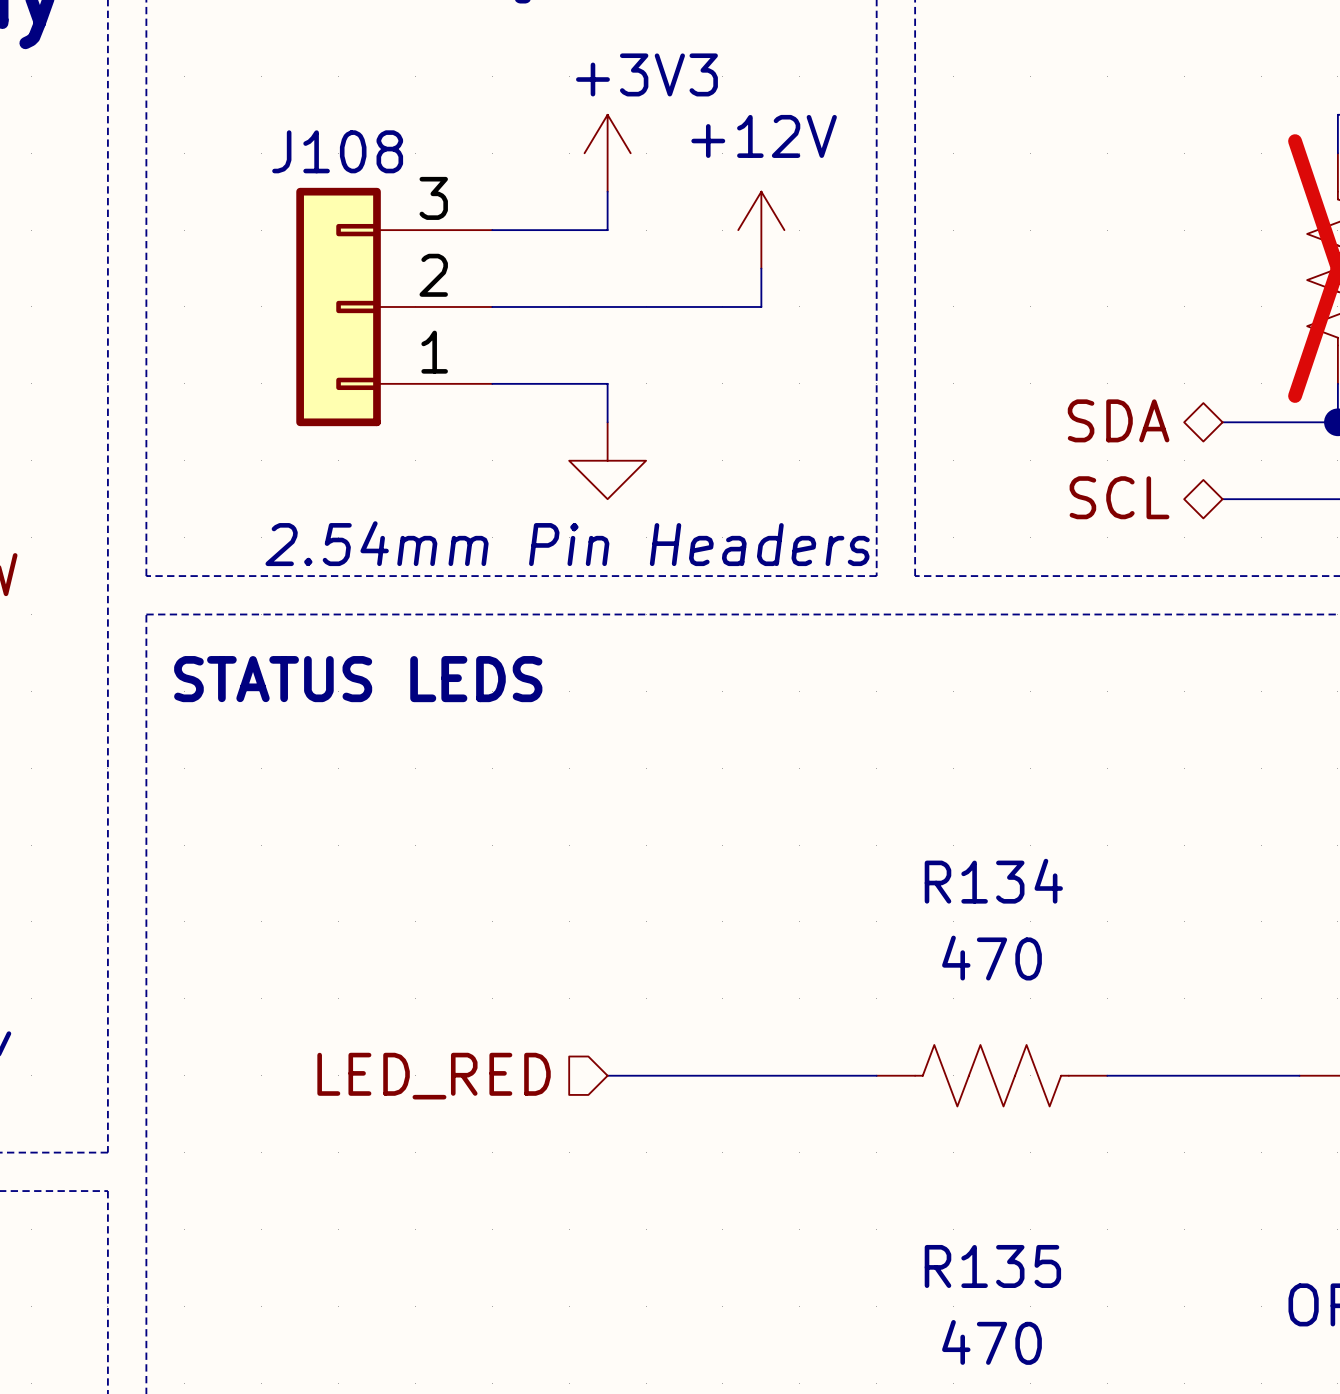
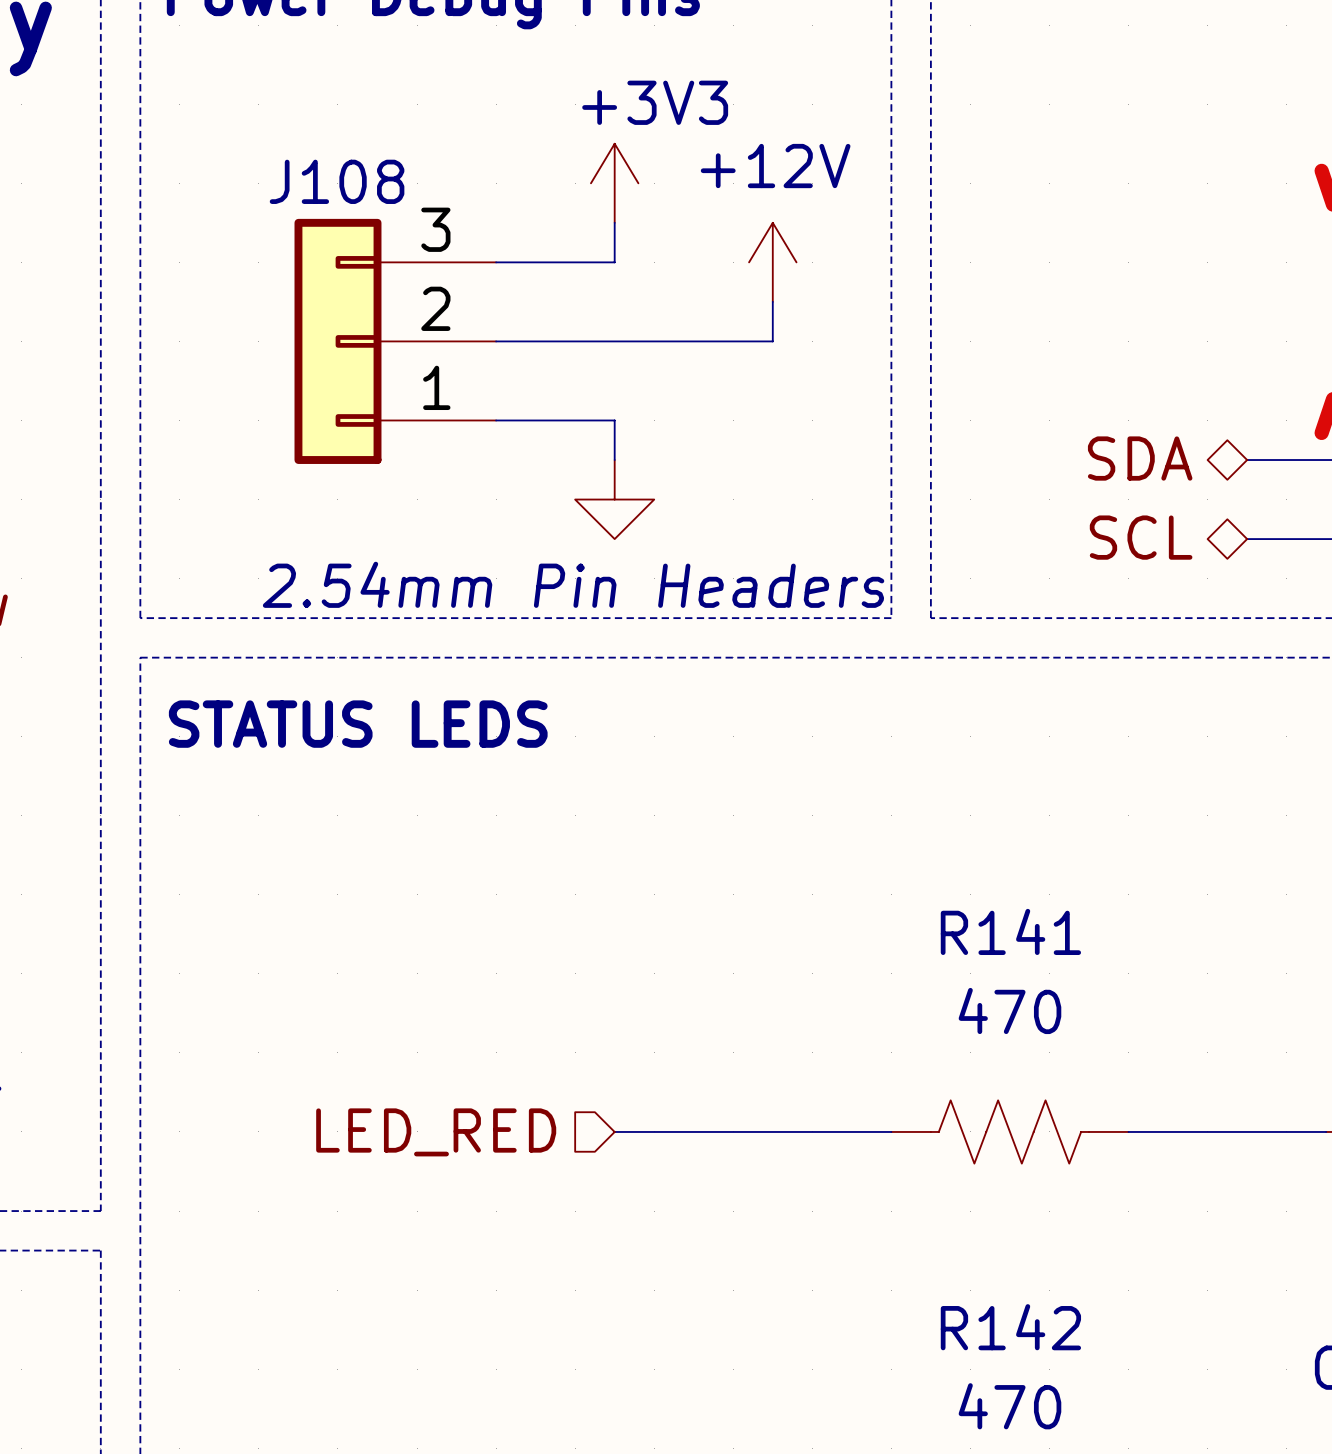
R134 name: R134 (993, 881) -> R141 (1010, 931)
R135 name: R135 (992, 1266) -> R142 (1010, 1327)

